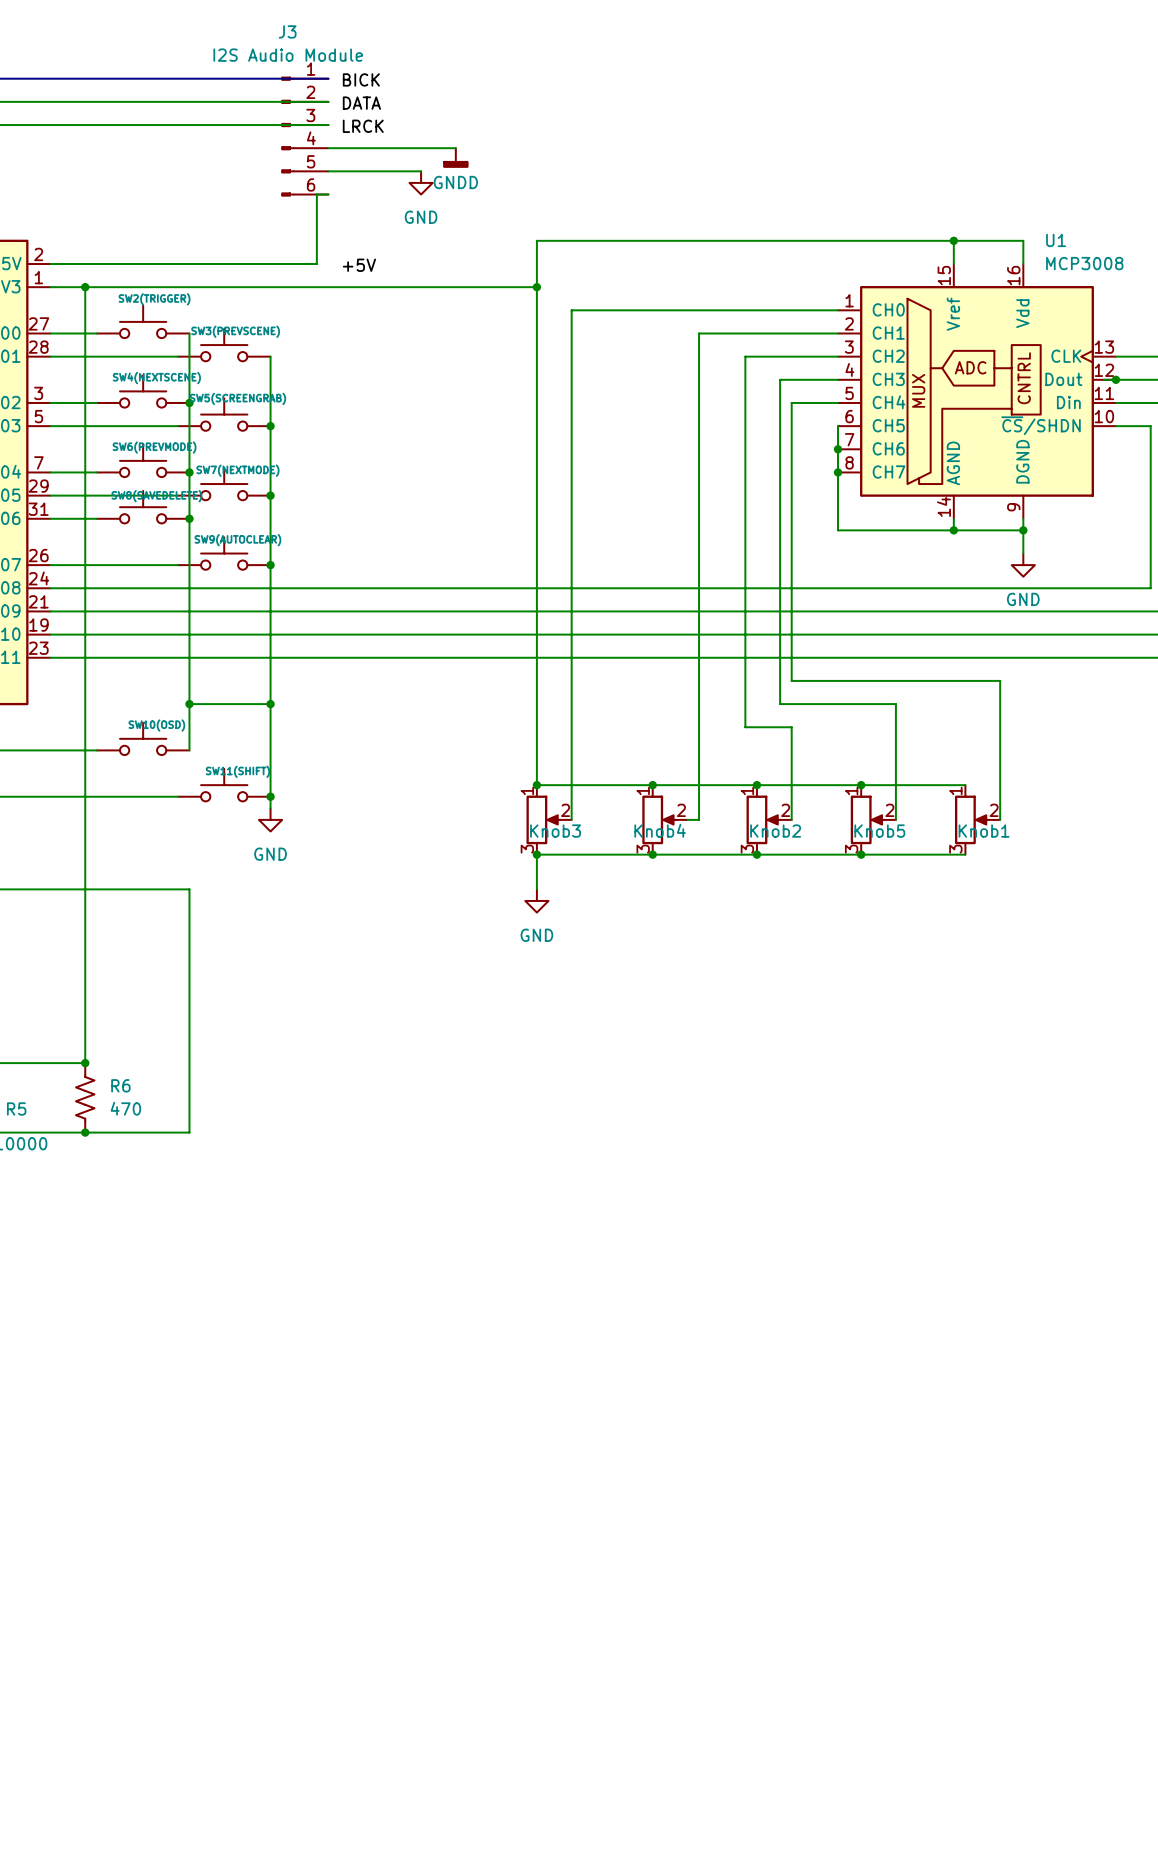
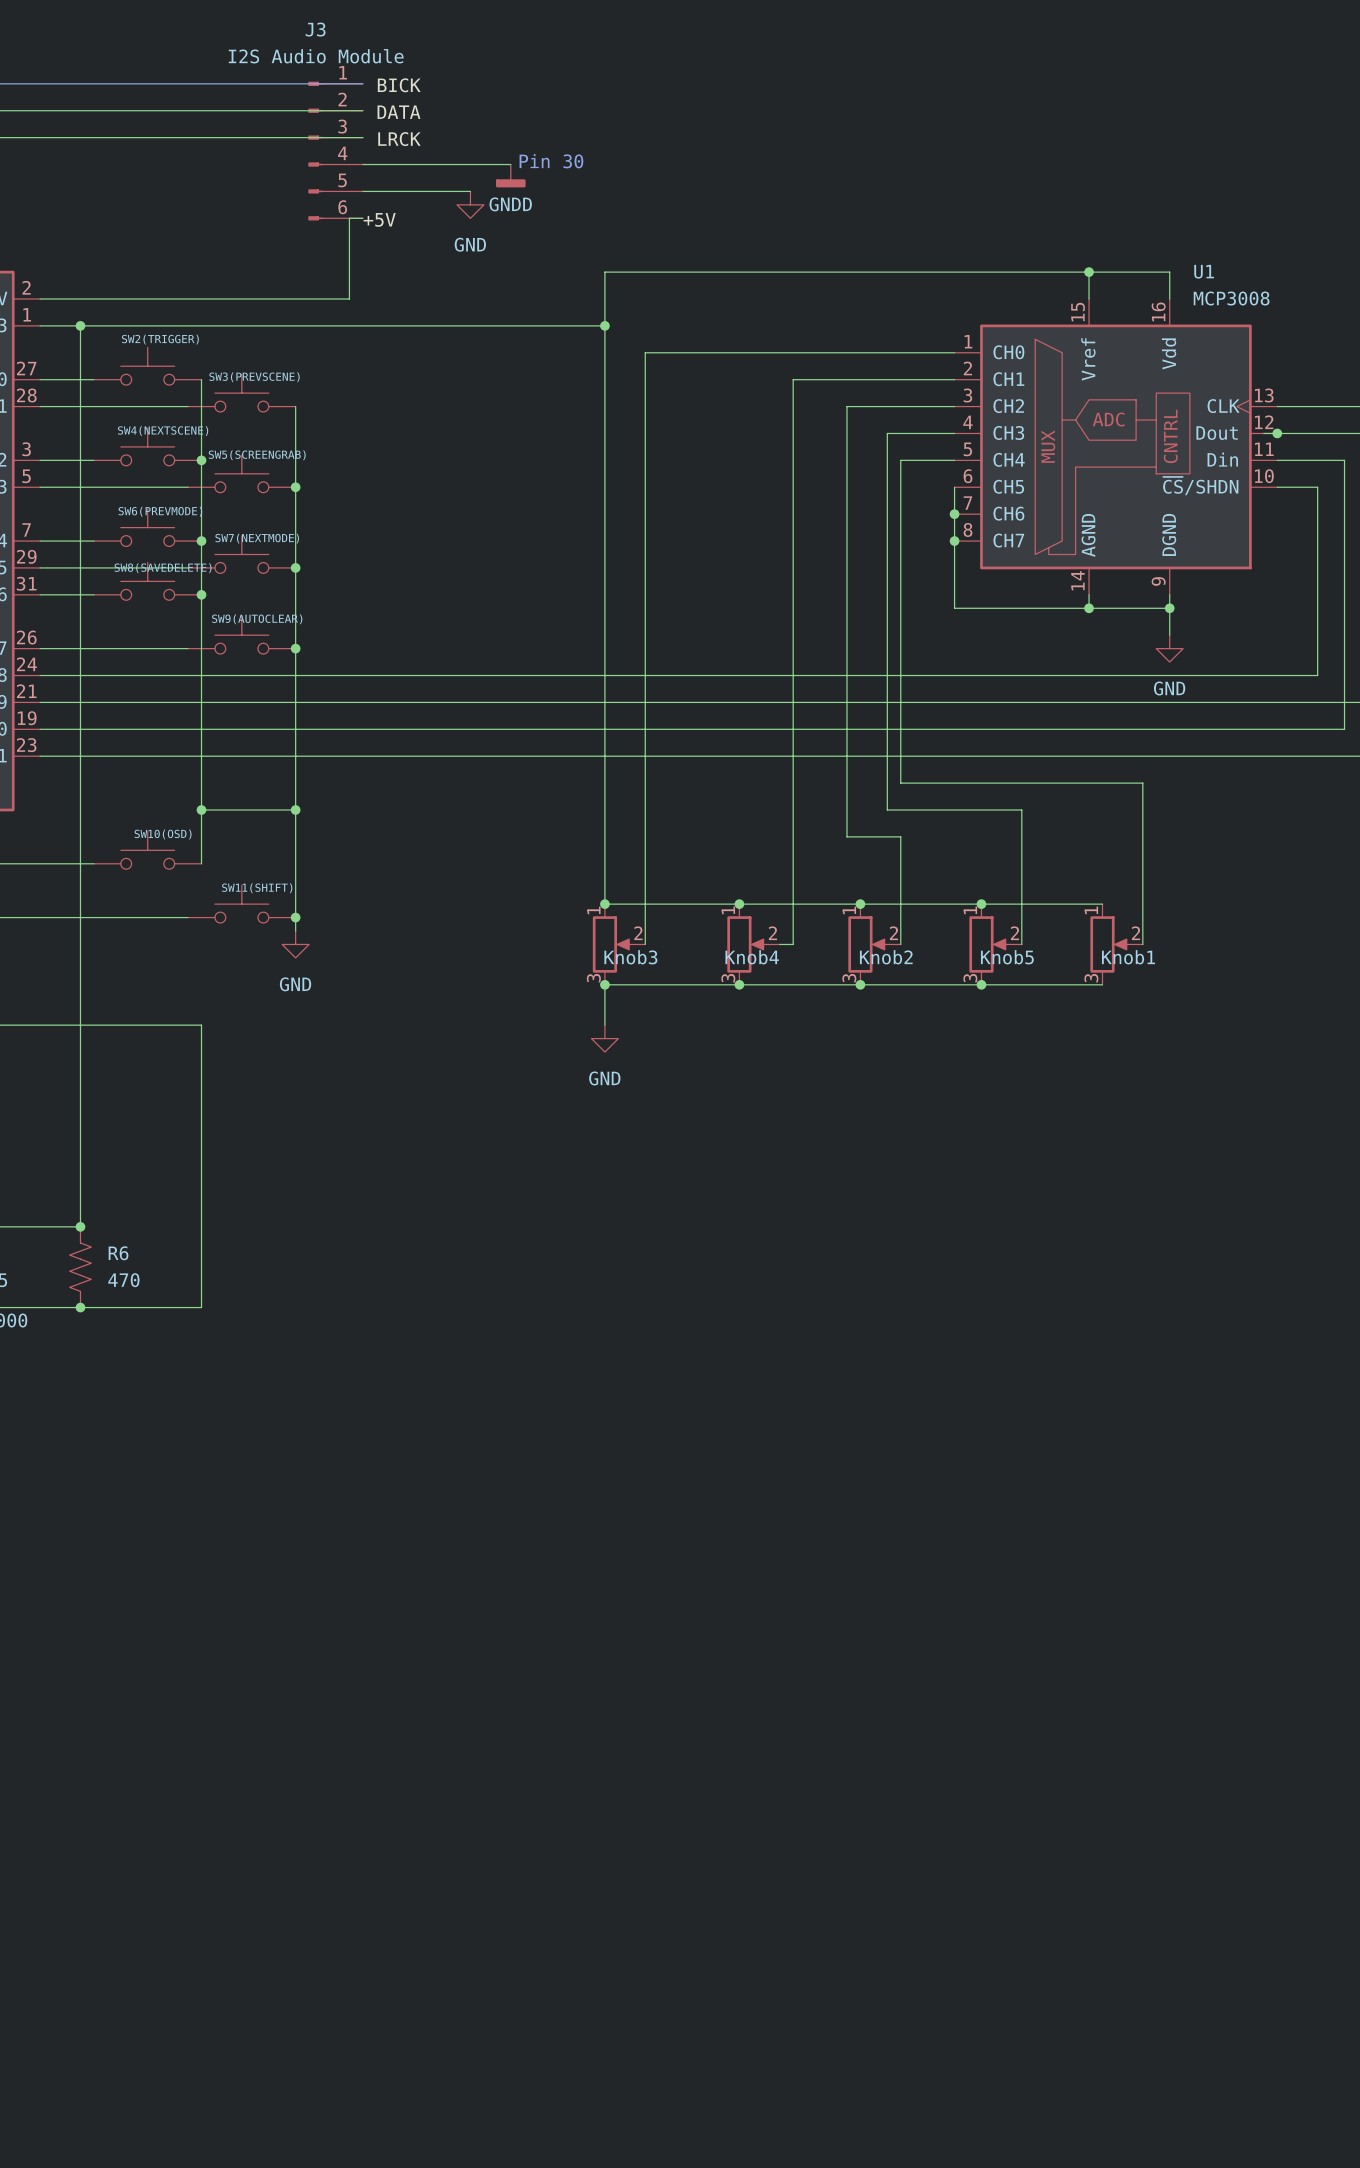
text: none -> Pin 30 (551, 161)
label position: +5V (359, 265) -> +5V (379, 219)

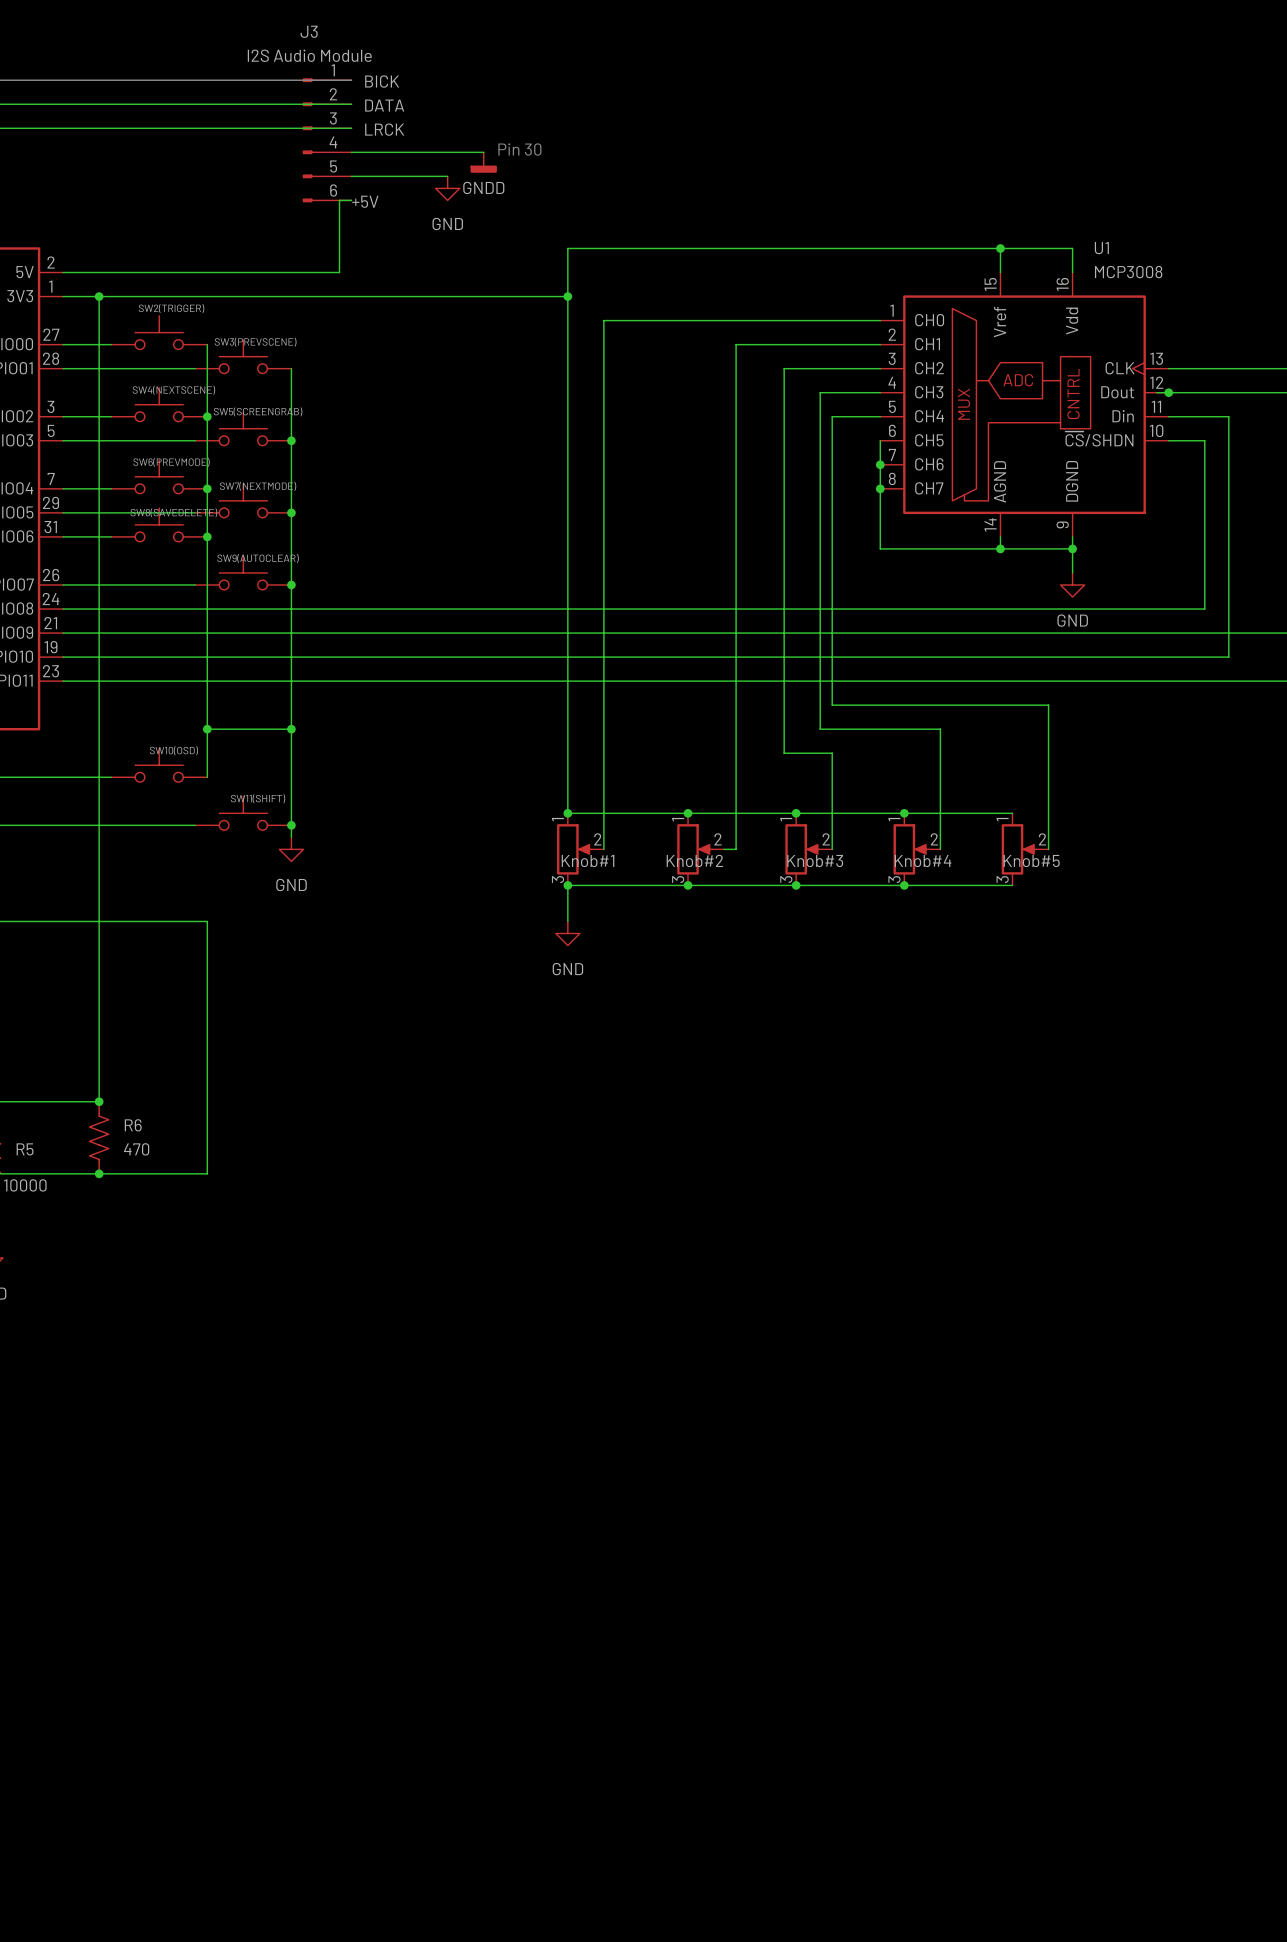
Knob3 name: Knob3 (630, 957) -> Knob#1 (588, 861)
Knob4 name: Knob4 (752, 957) -> Knob#2 (694, 860)
Knob2 name: Knob2 (886, 957) -> Knob#3 (815, 861)
Knob5 name: Knob5 (1007, 957) -> Knob#4 (923, 861)
Knob1 name: Knob1 (1128, 957) -> Knob#5 (1031, 861)

